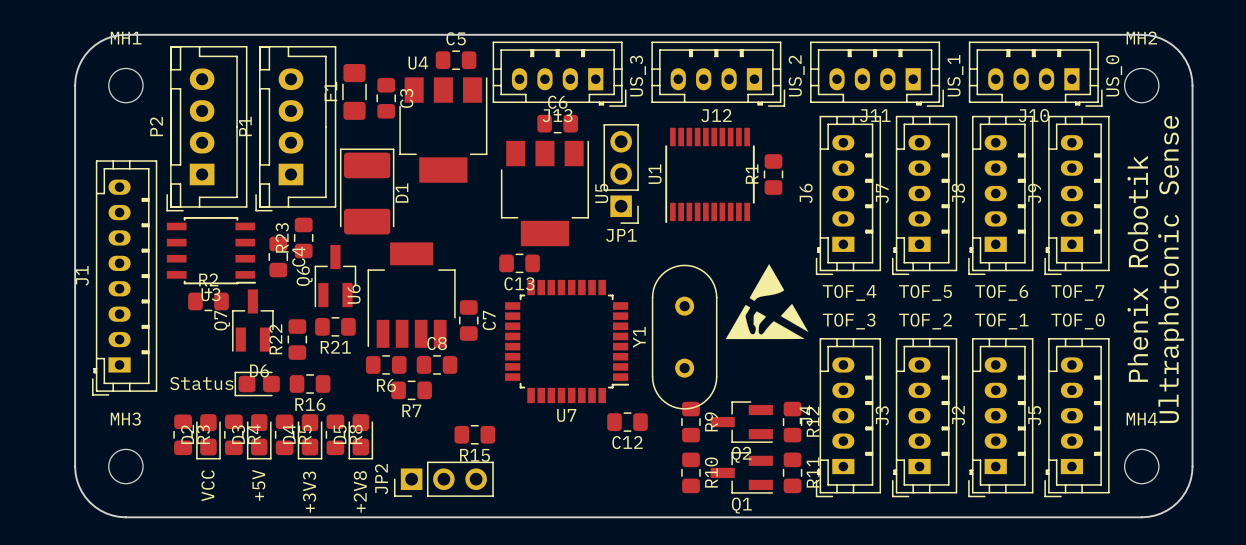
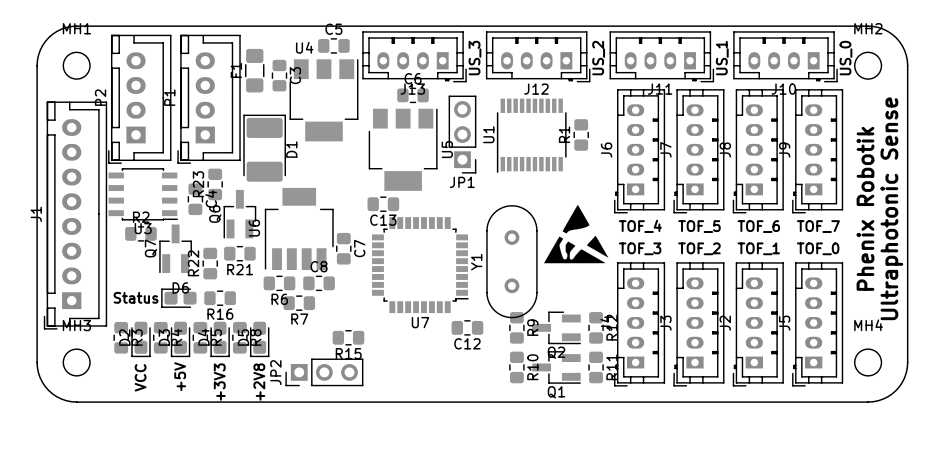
J1 footprint: [92, 160, 158, 396] -> [43, 101, 108, 330]

